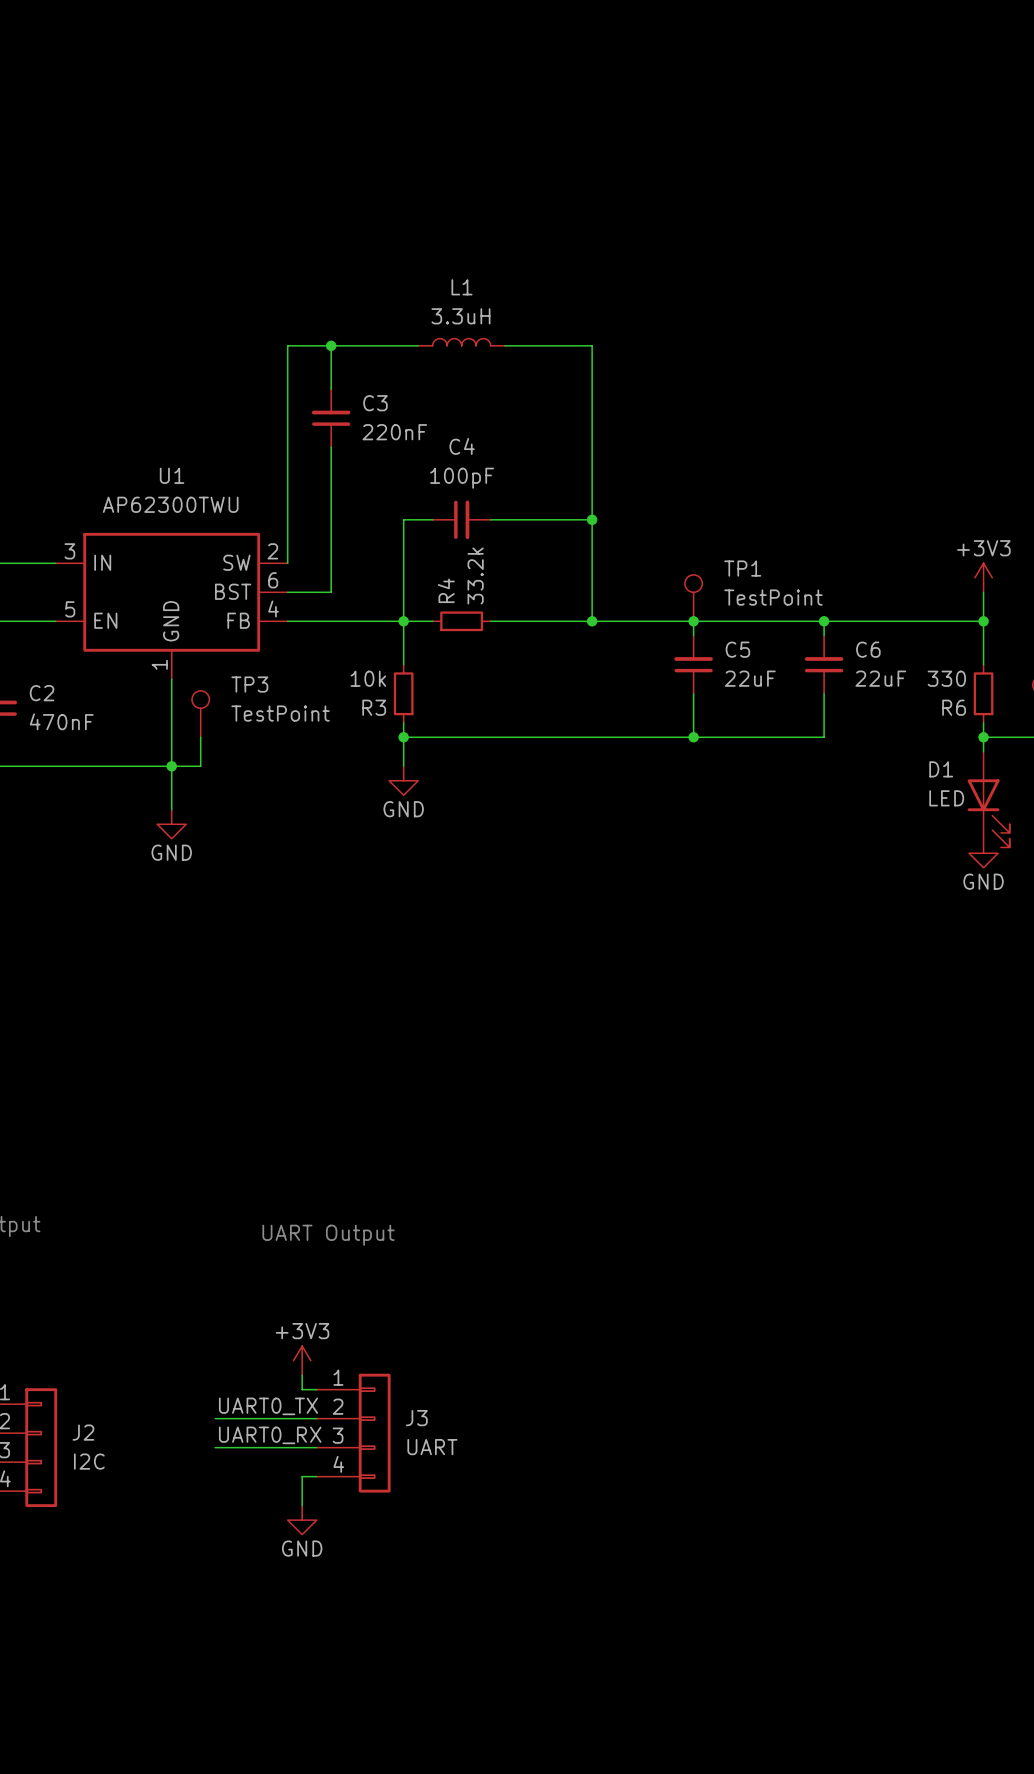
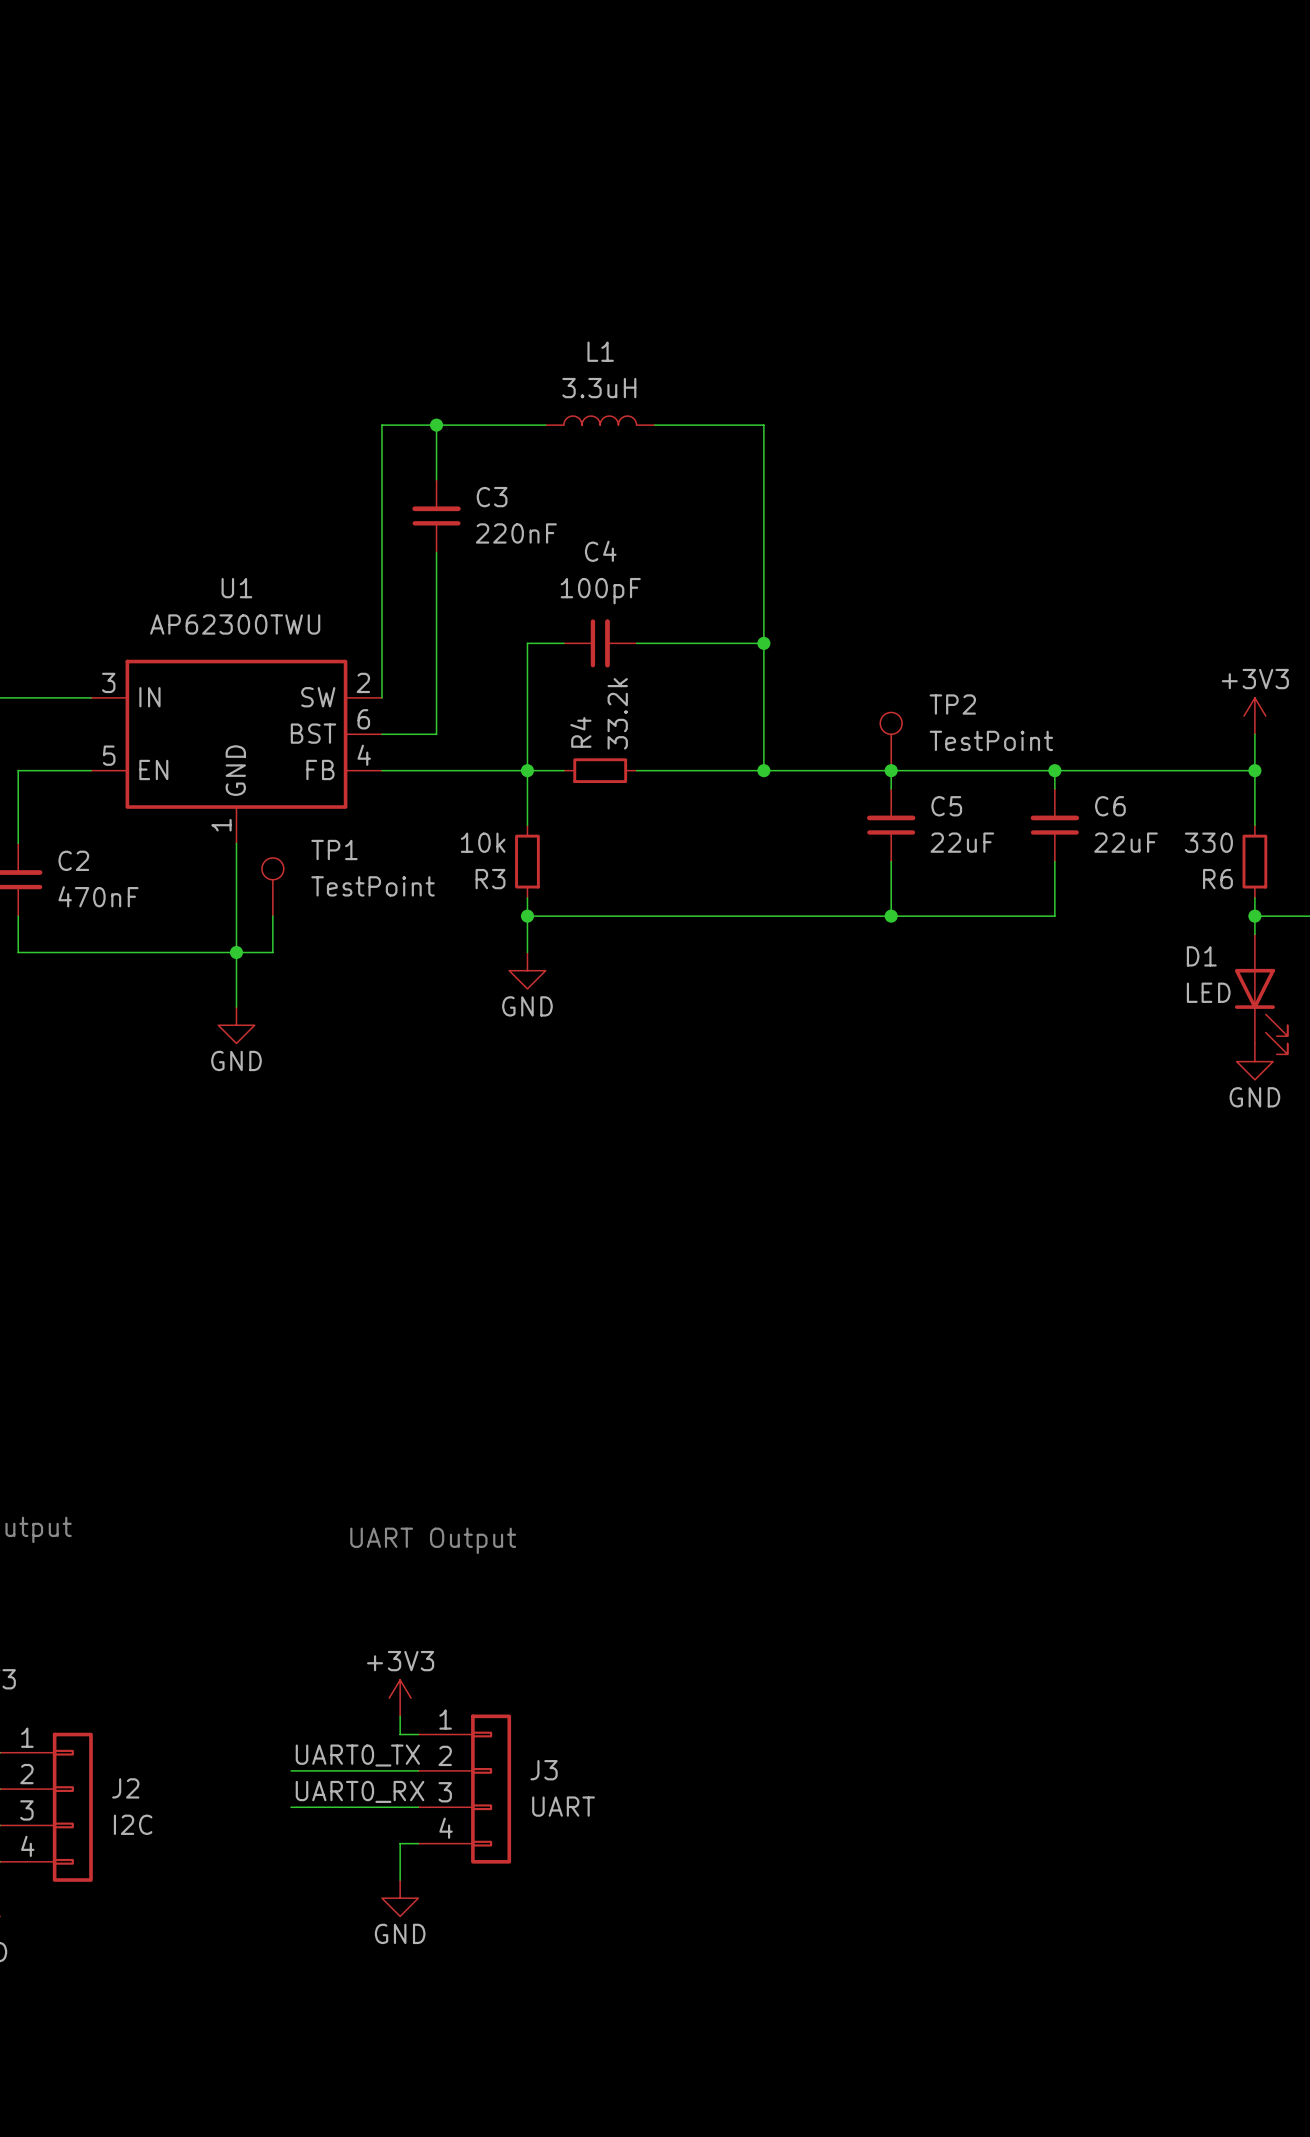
TP1 name: TP1 (742, 568) -> TP2 (952, 704)
TP3 name: TP3 (249, 684) -> TP1 (334, 849)

